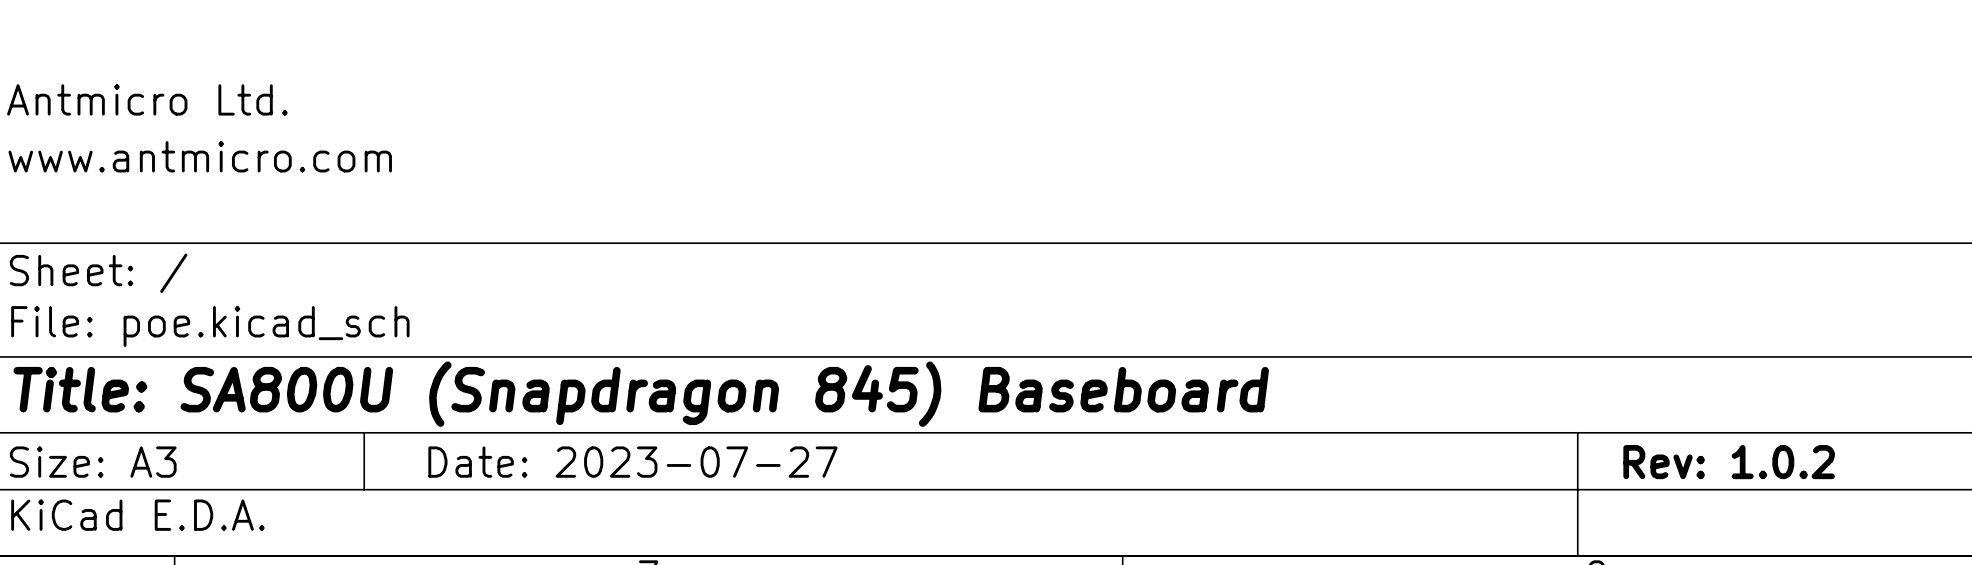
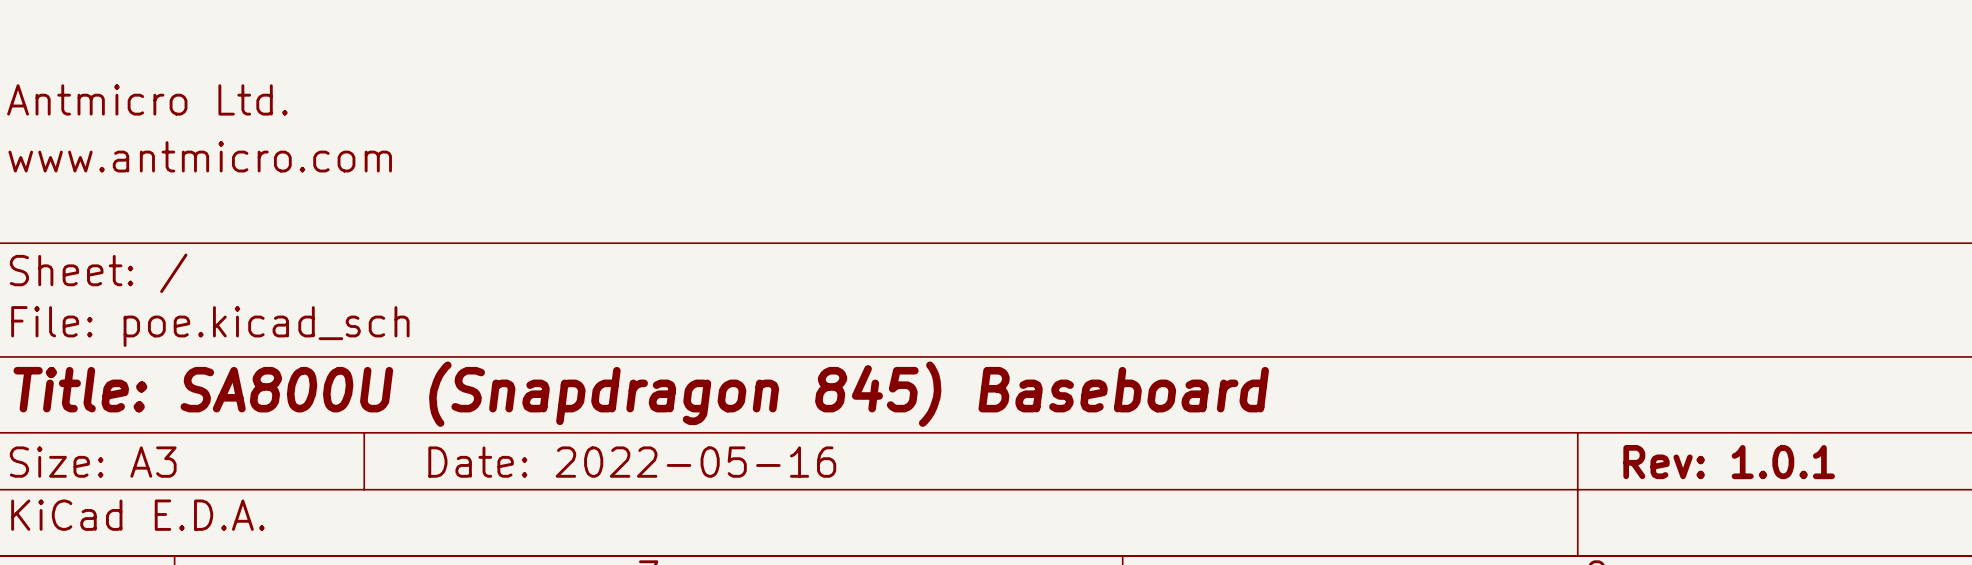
title block: Date: 2023-07-27 (632, 462) -> Date: 2022-05-16 (632, 462)
title block: Rev: 1.0.2 (1729, 462) -> Rev: 1.0.1 (1729, 462)

